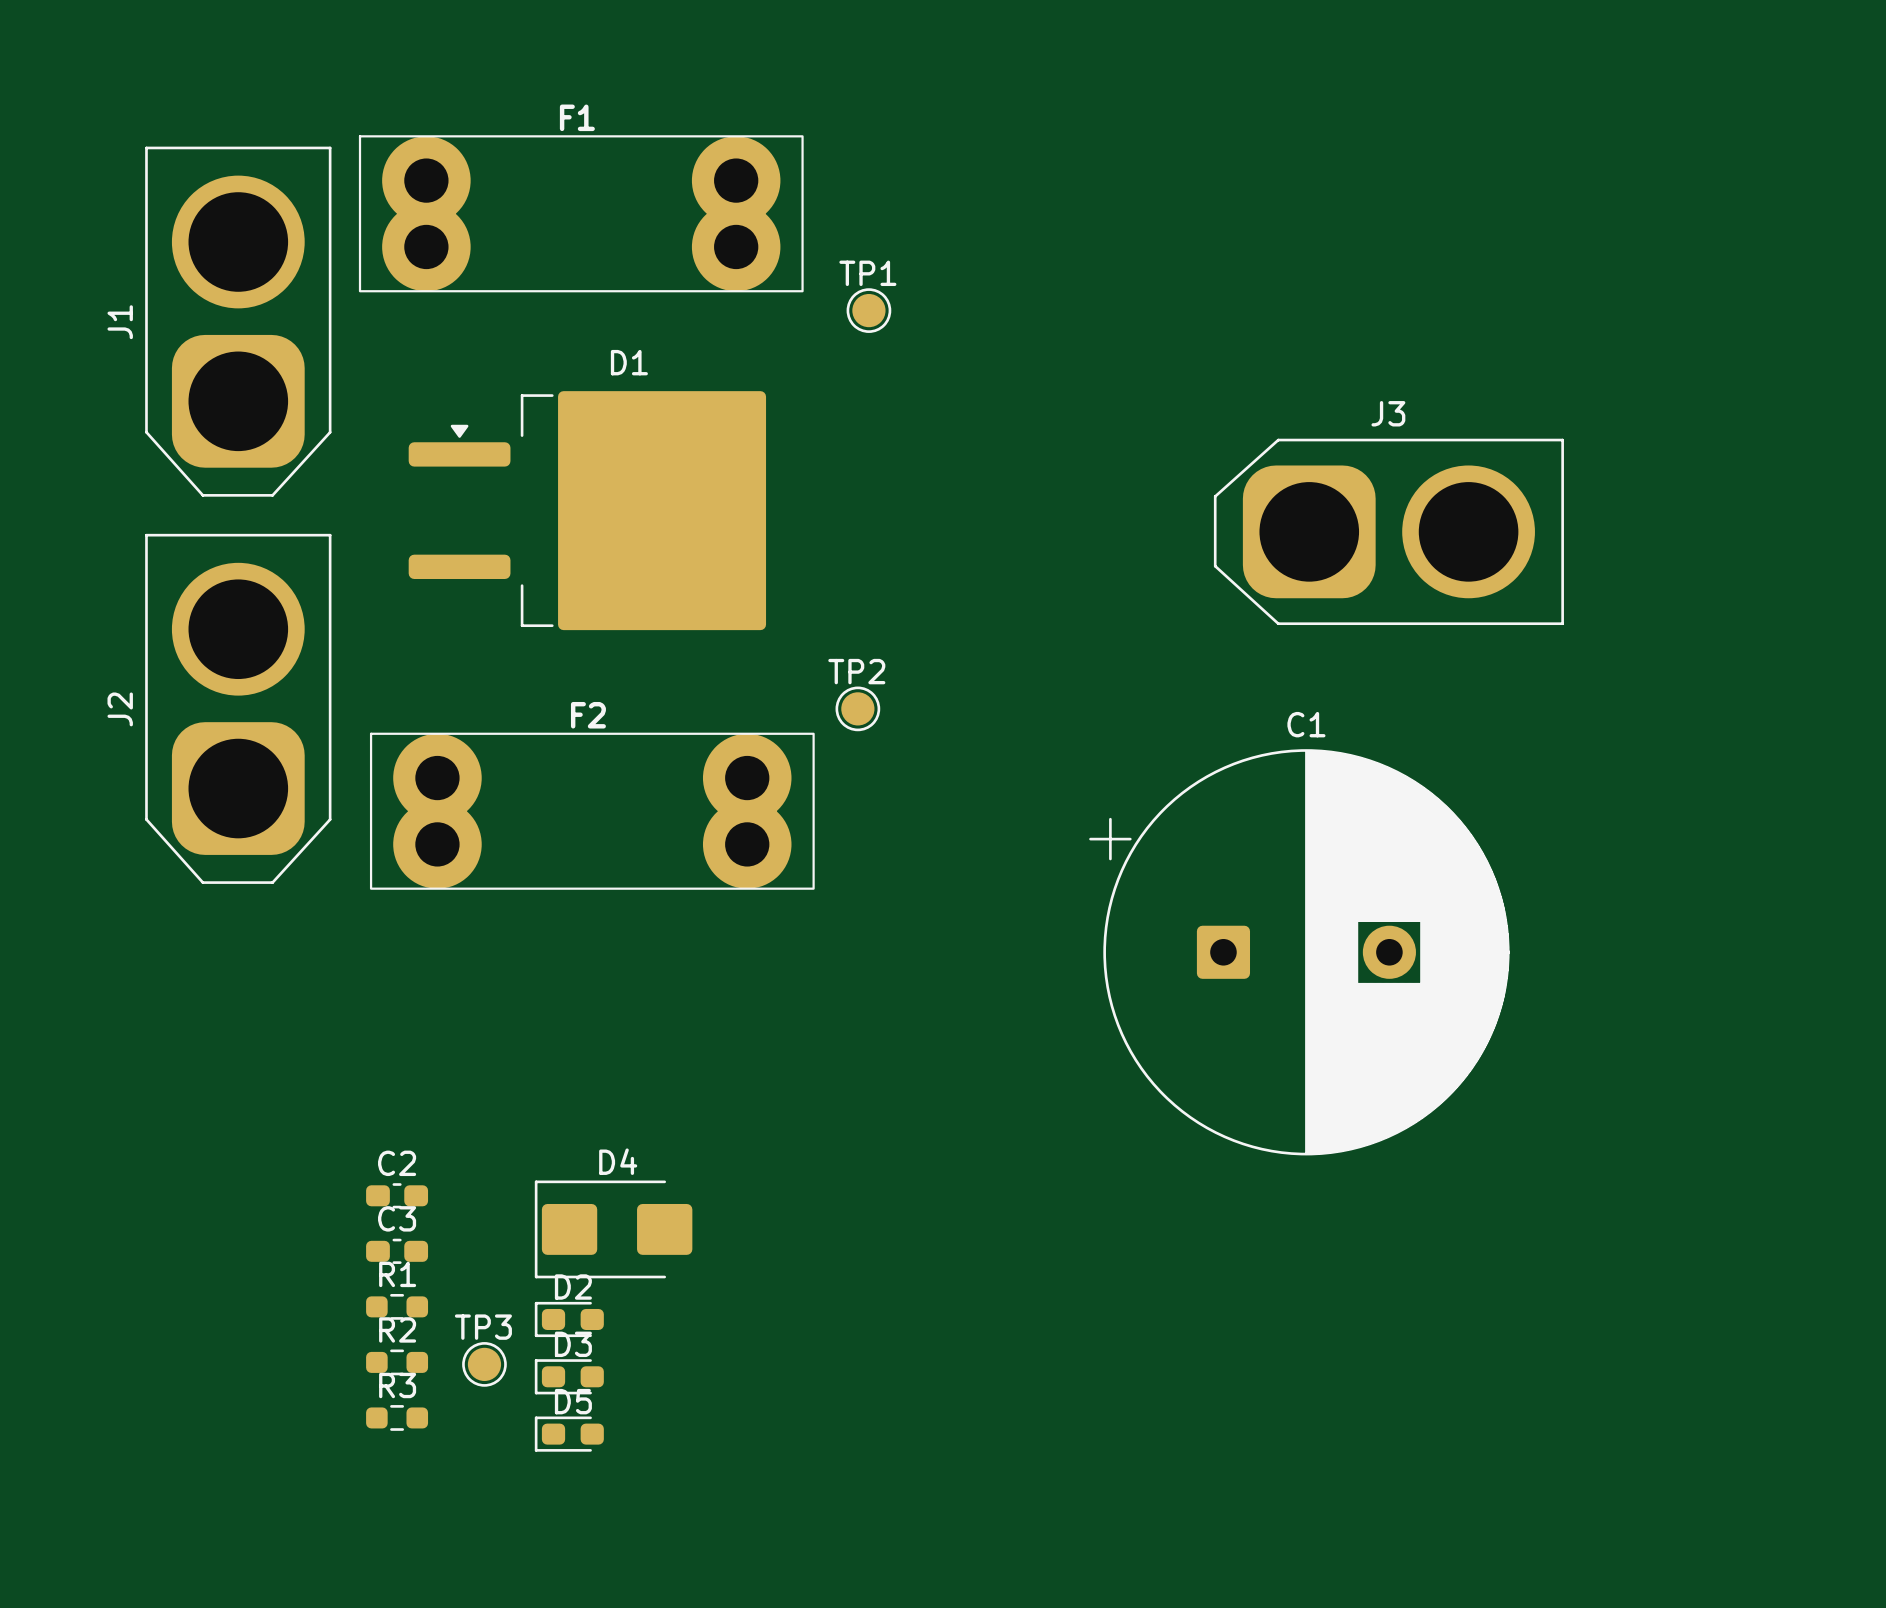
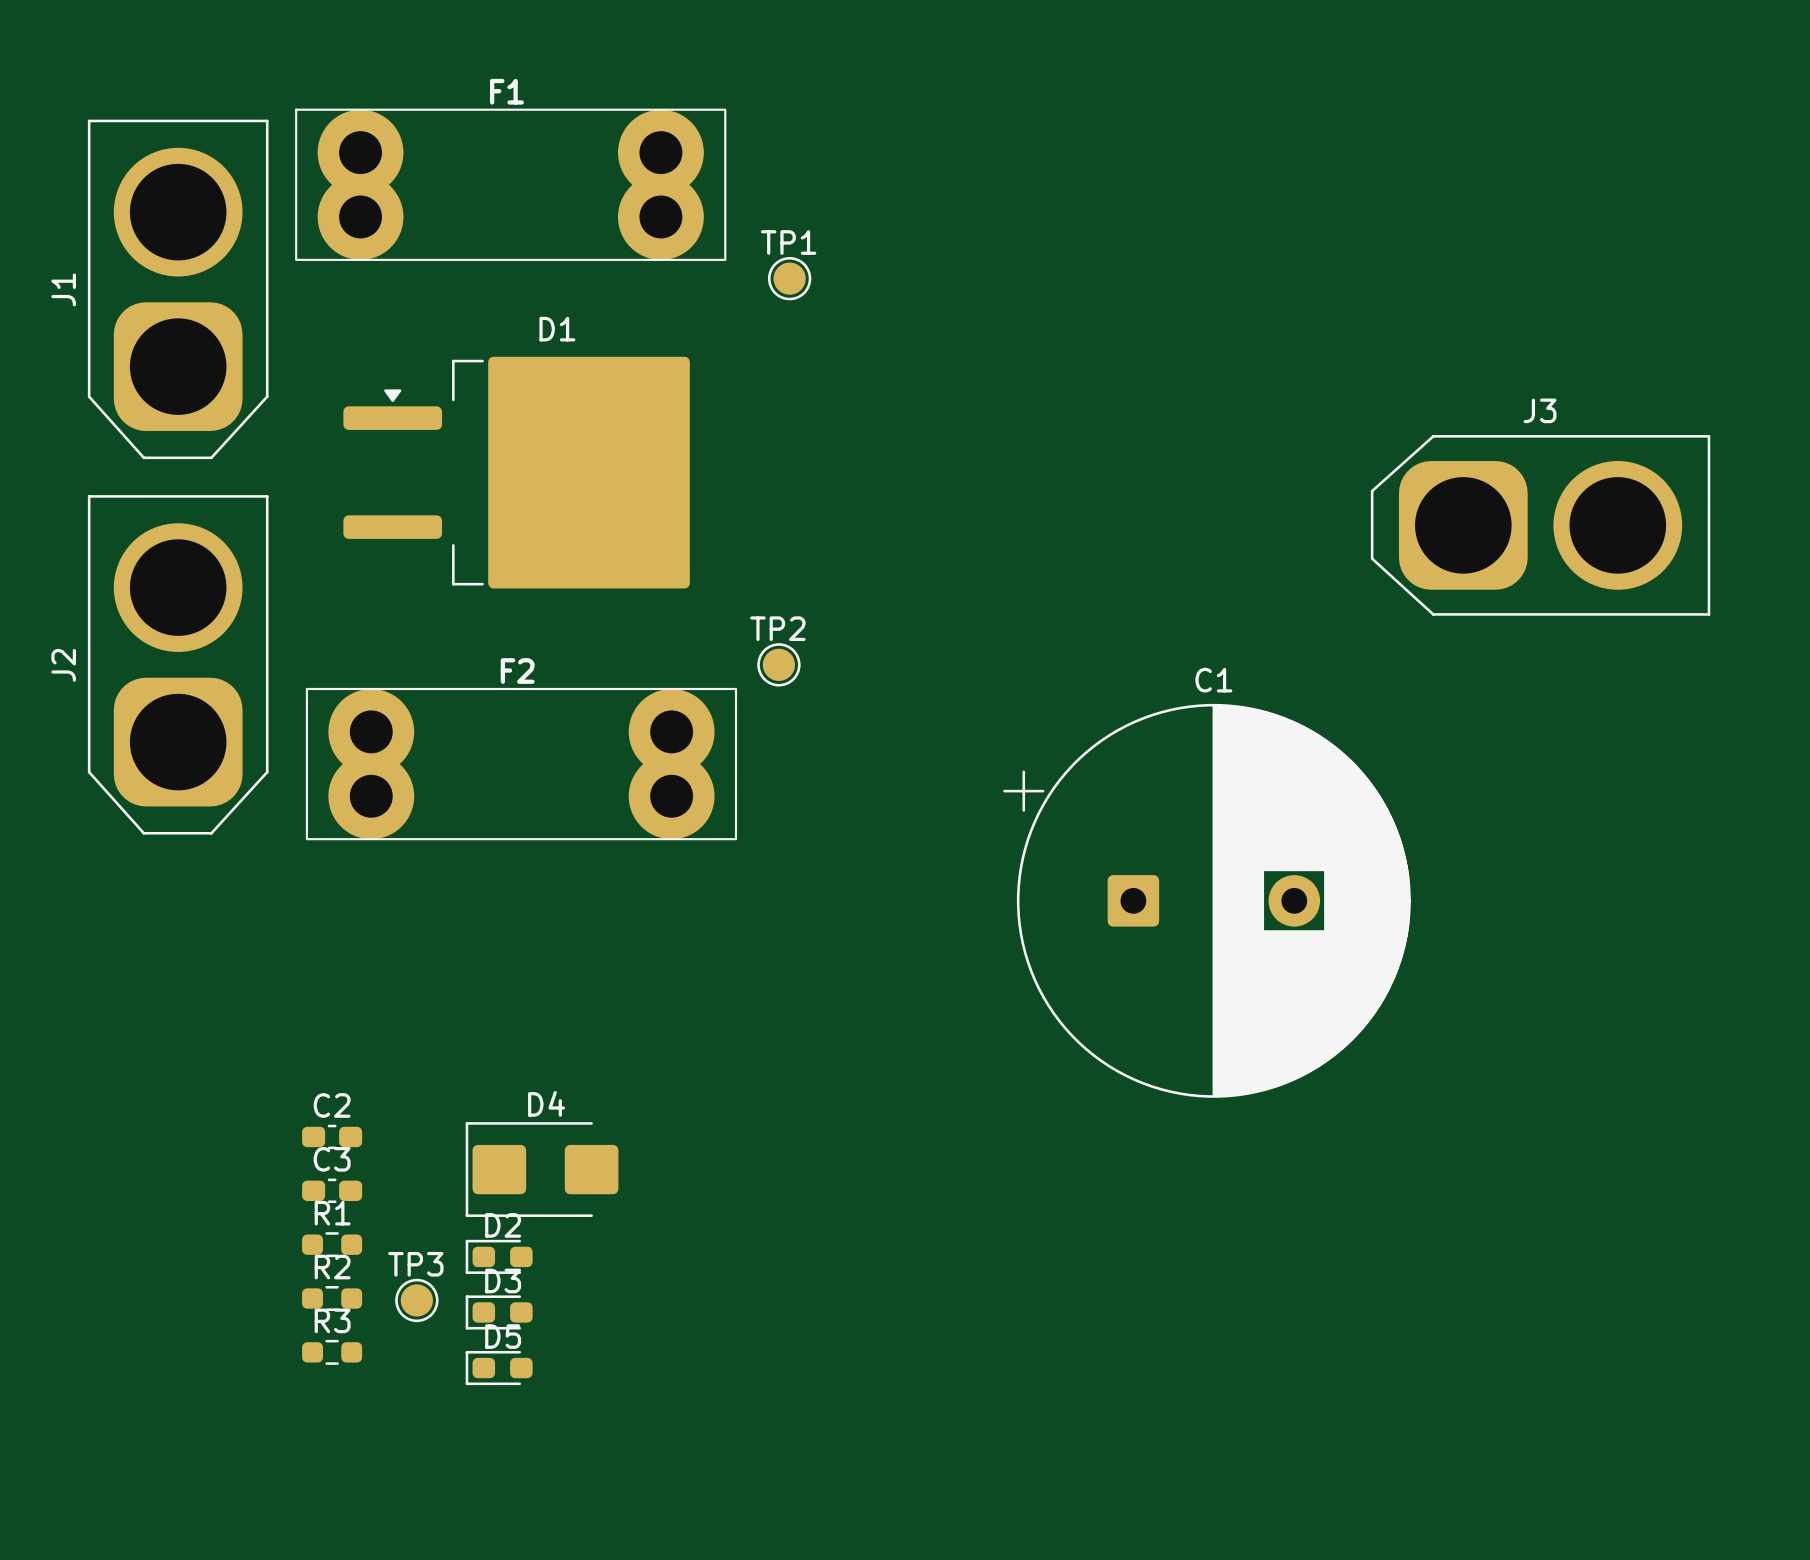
J3 position: (1388, 531) -> (1540, 525)

